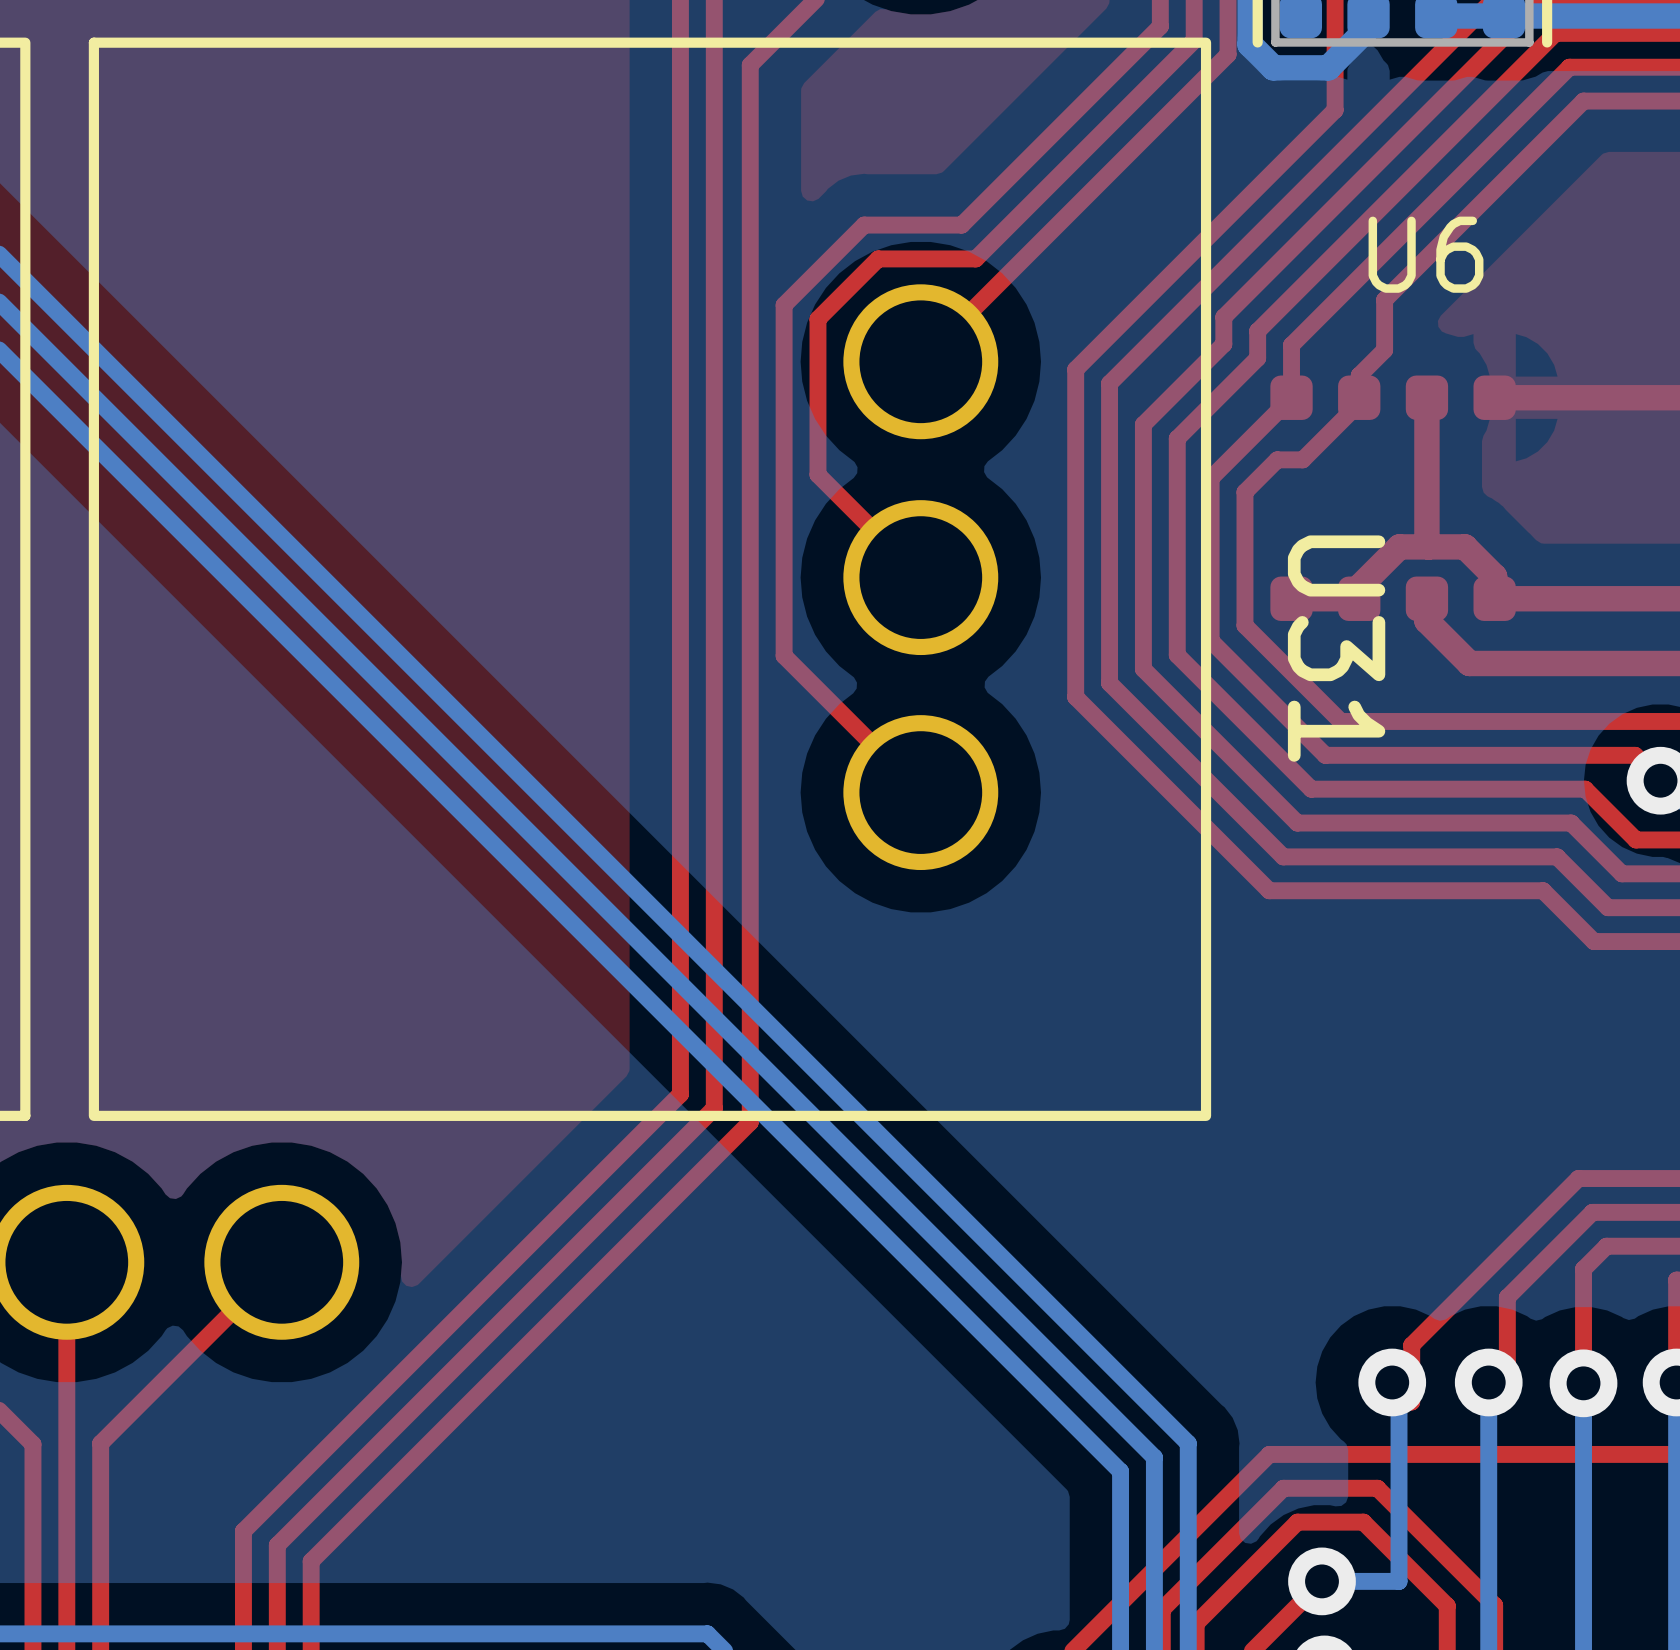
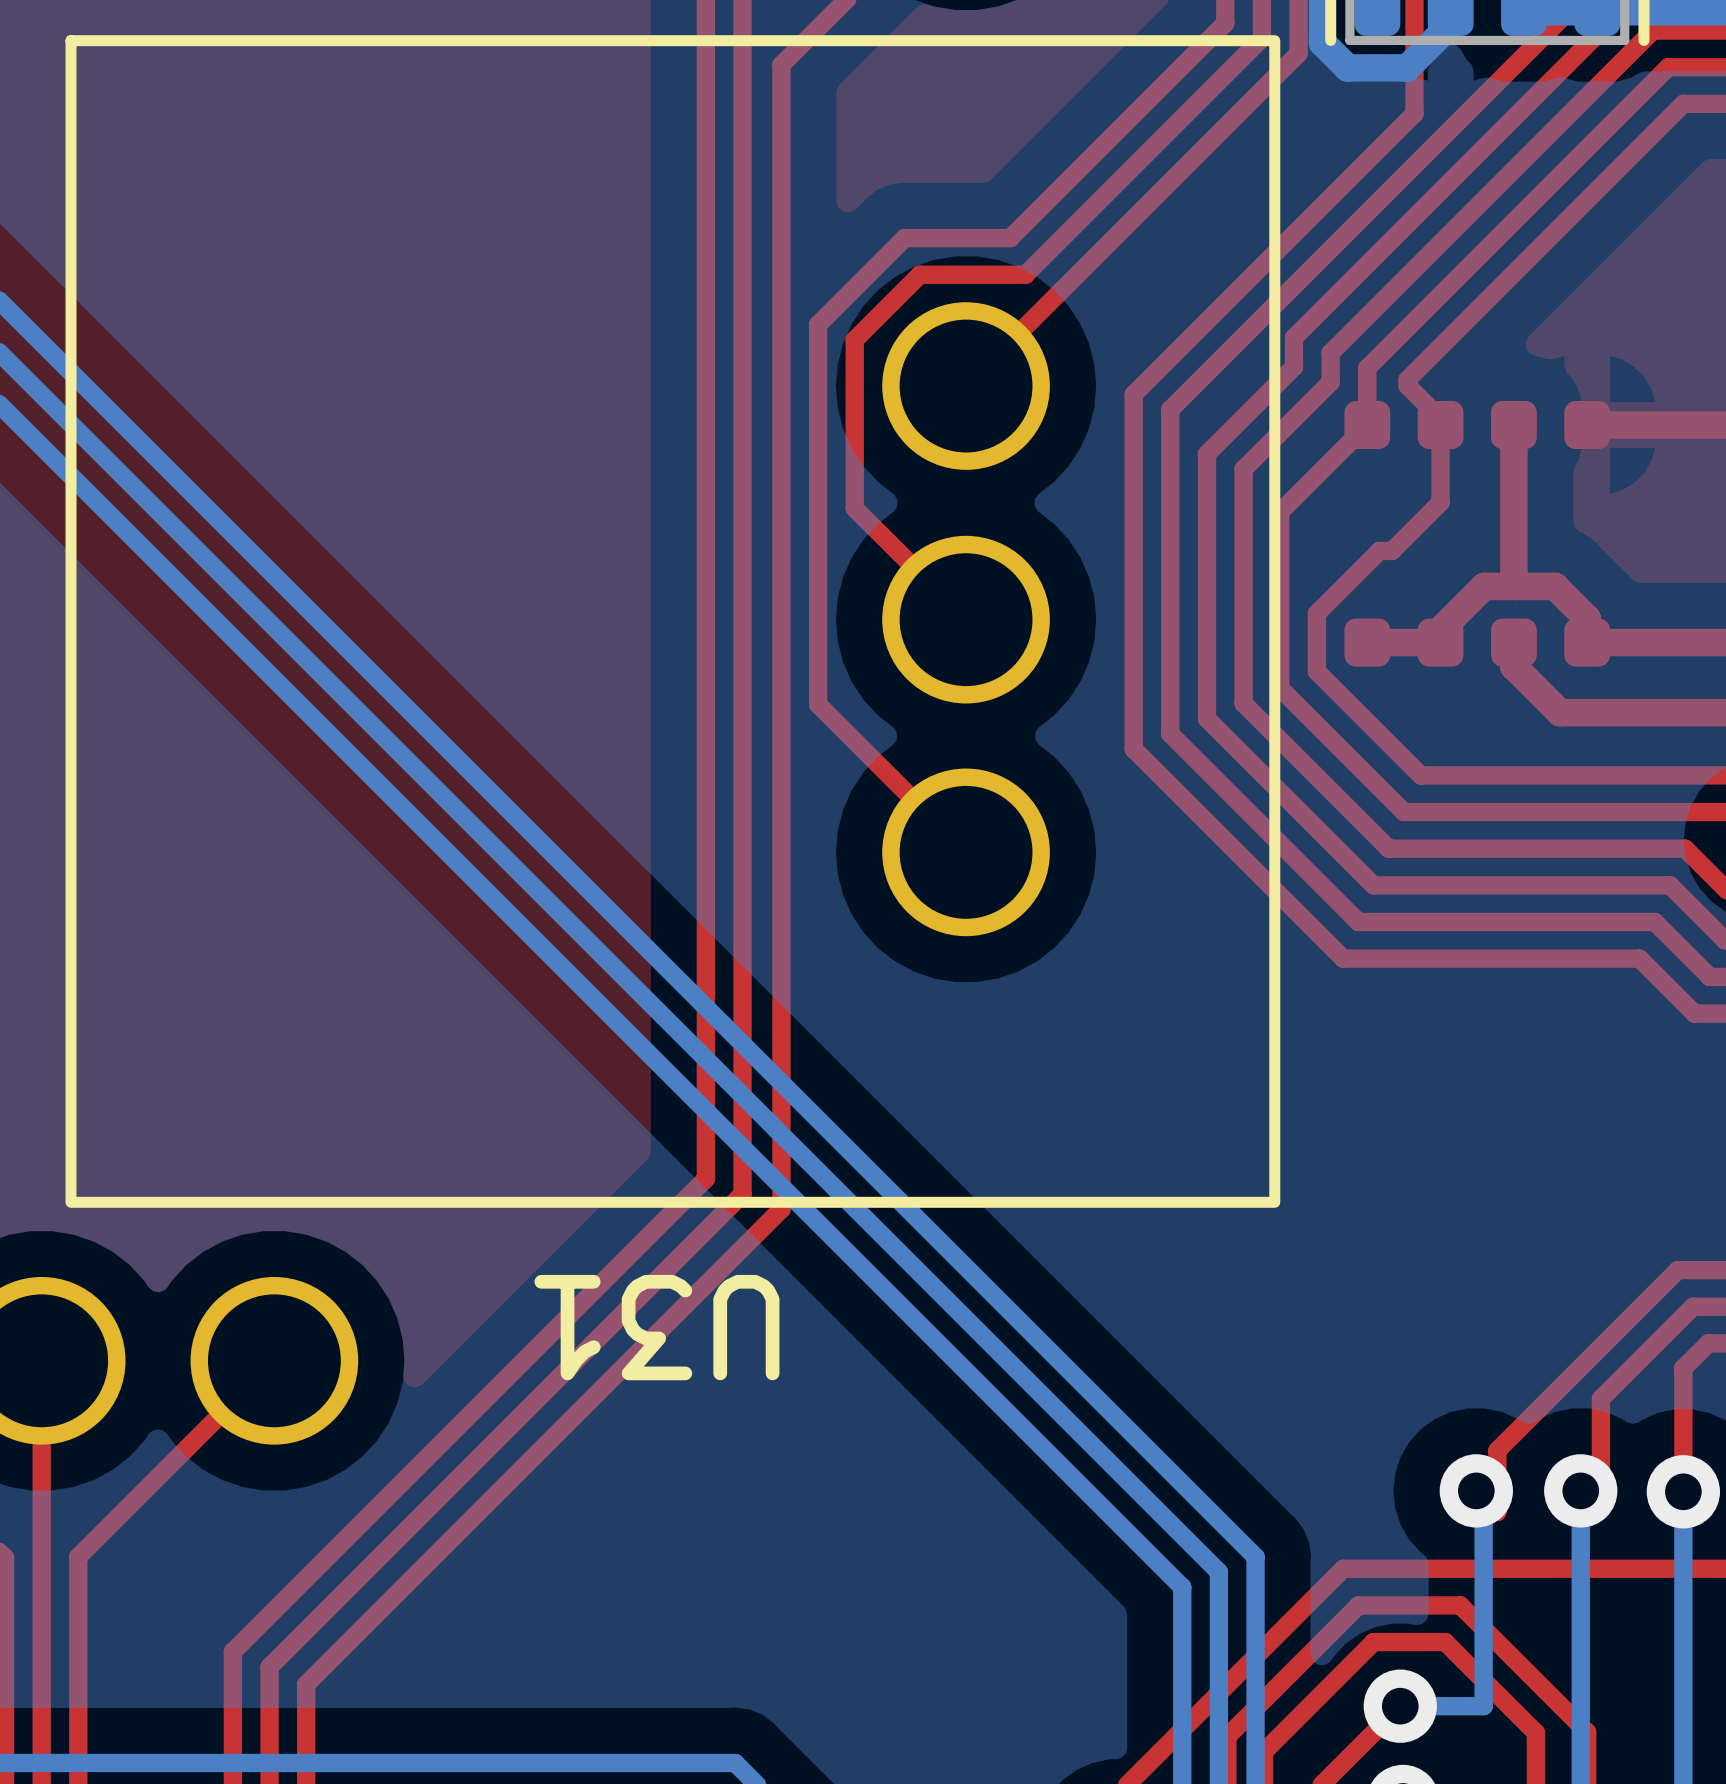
U6 name: U6 (1426, 254) -> none
top track: (1384, 299) (1384, 350) (1359, 375) (1359, 392) -> (1468, 319) (1407, 379) (1407, 385) (1440, 418)
top track: (1359, 403) (1302, 459) (1277, 459) (1244, 492) (1244, 571) -> (1440, 431) (1440, 502) (1392, 550) (1379, 550) (1316, 613)
U31 name rotation: 0° (1336, 648) -> 90° clockwise (656, 1327)
U31 name position: U31 (1336, 648) -> U31 (656, 1327)

